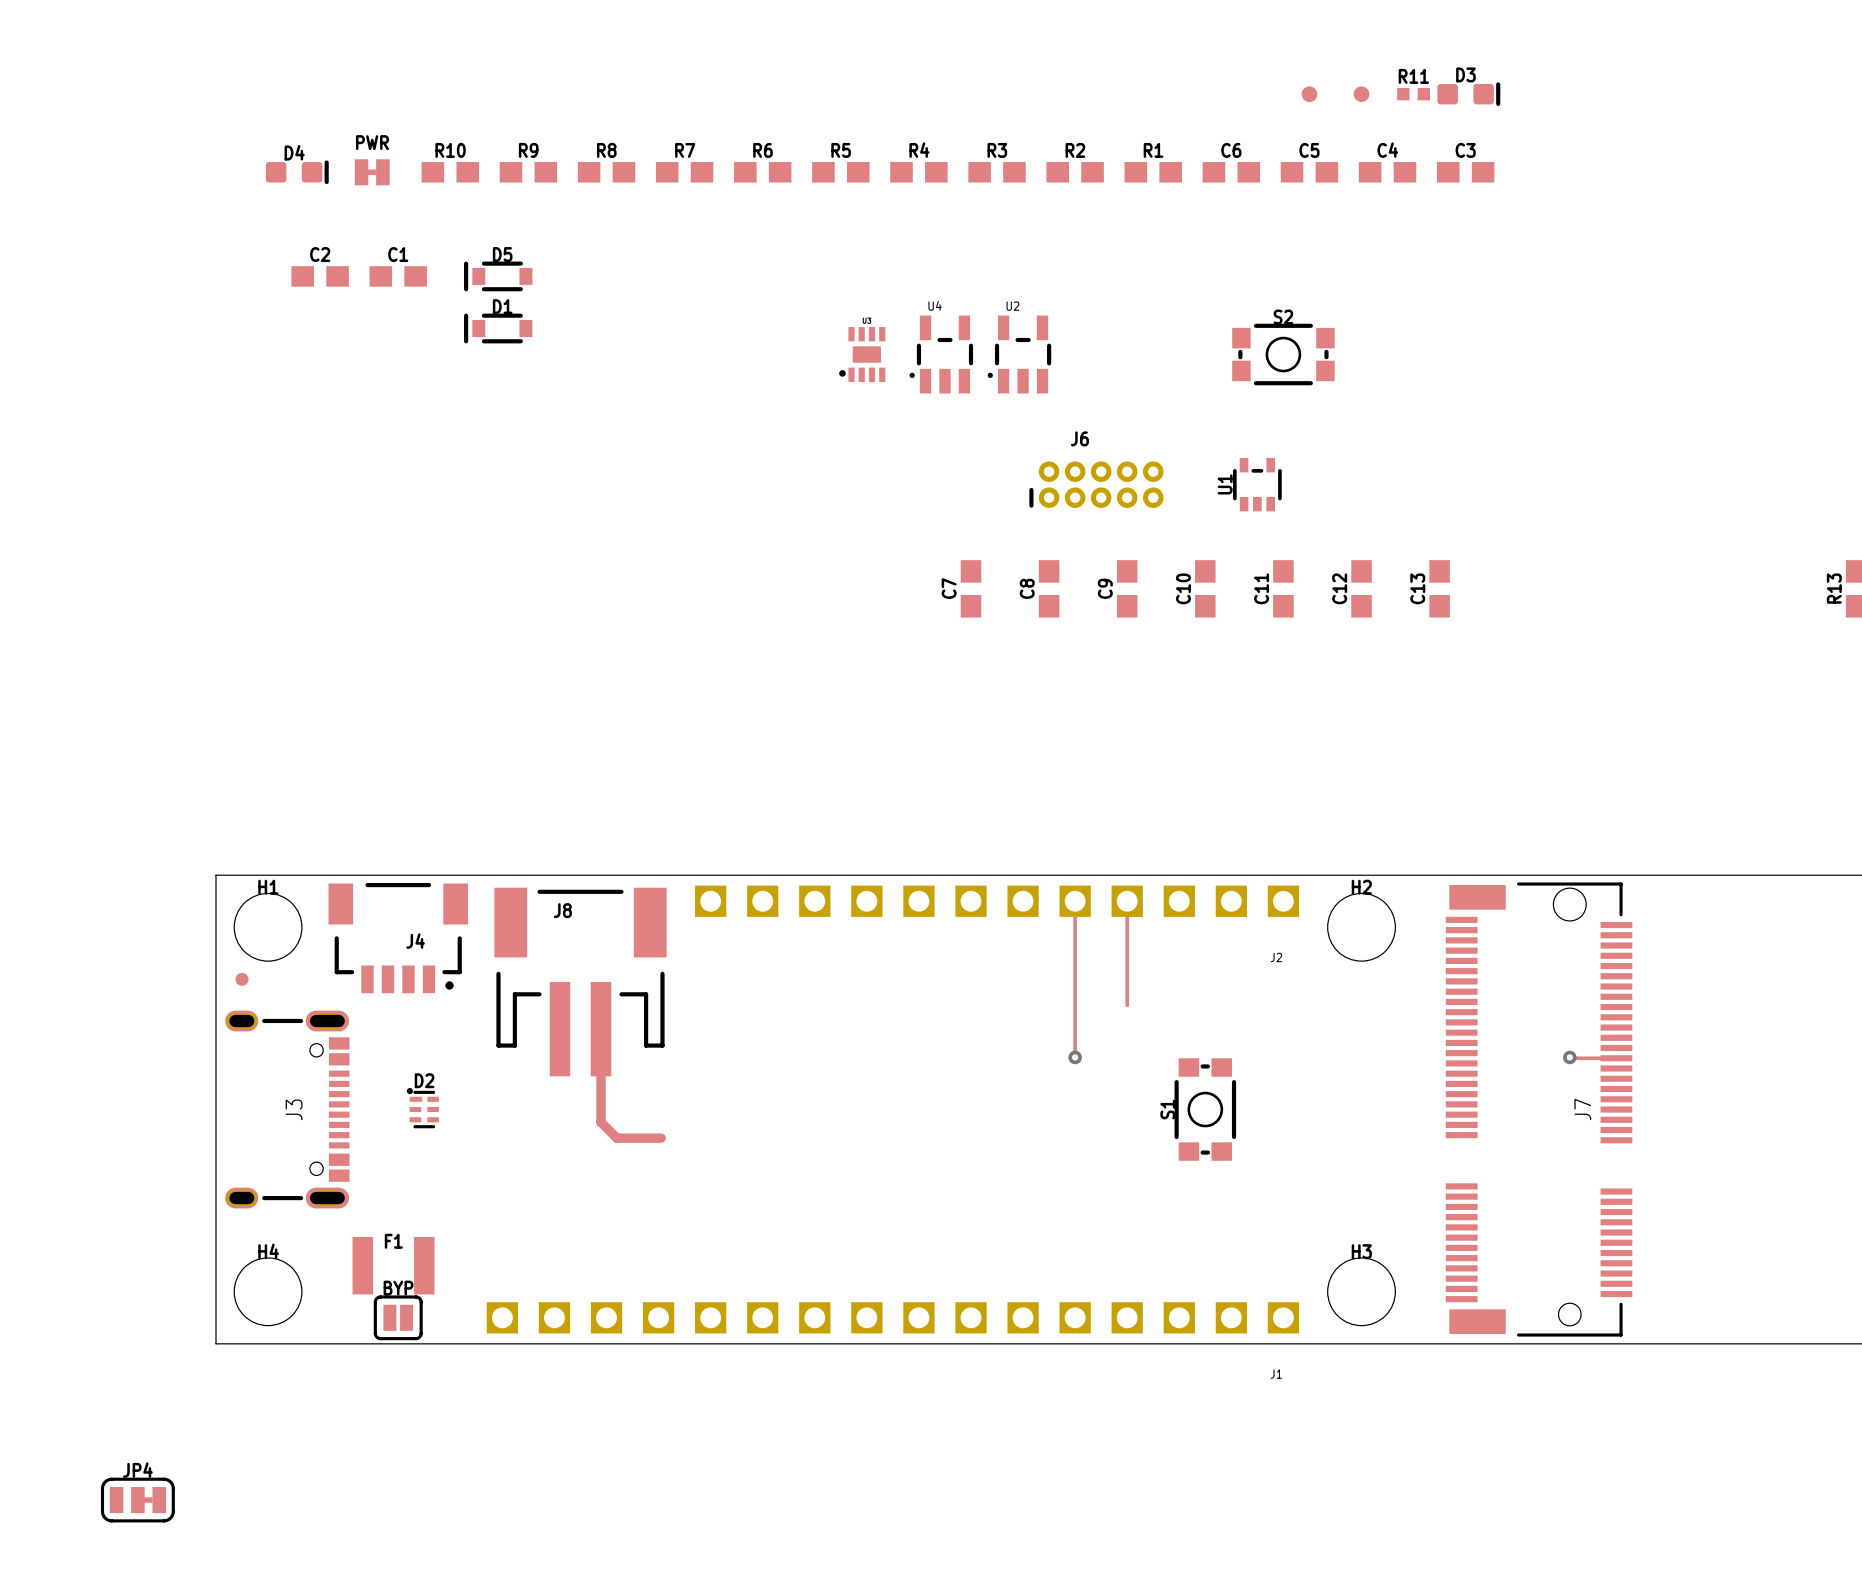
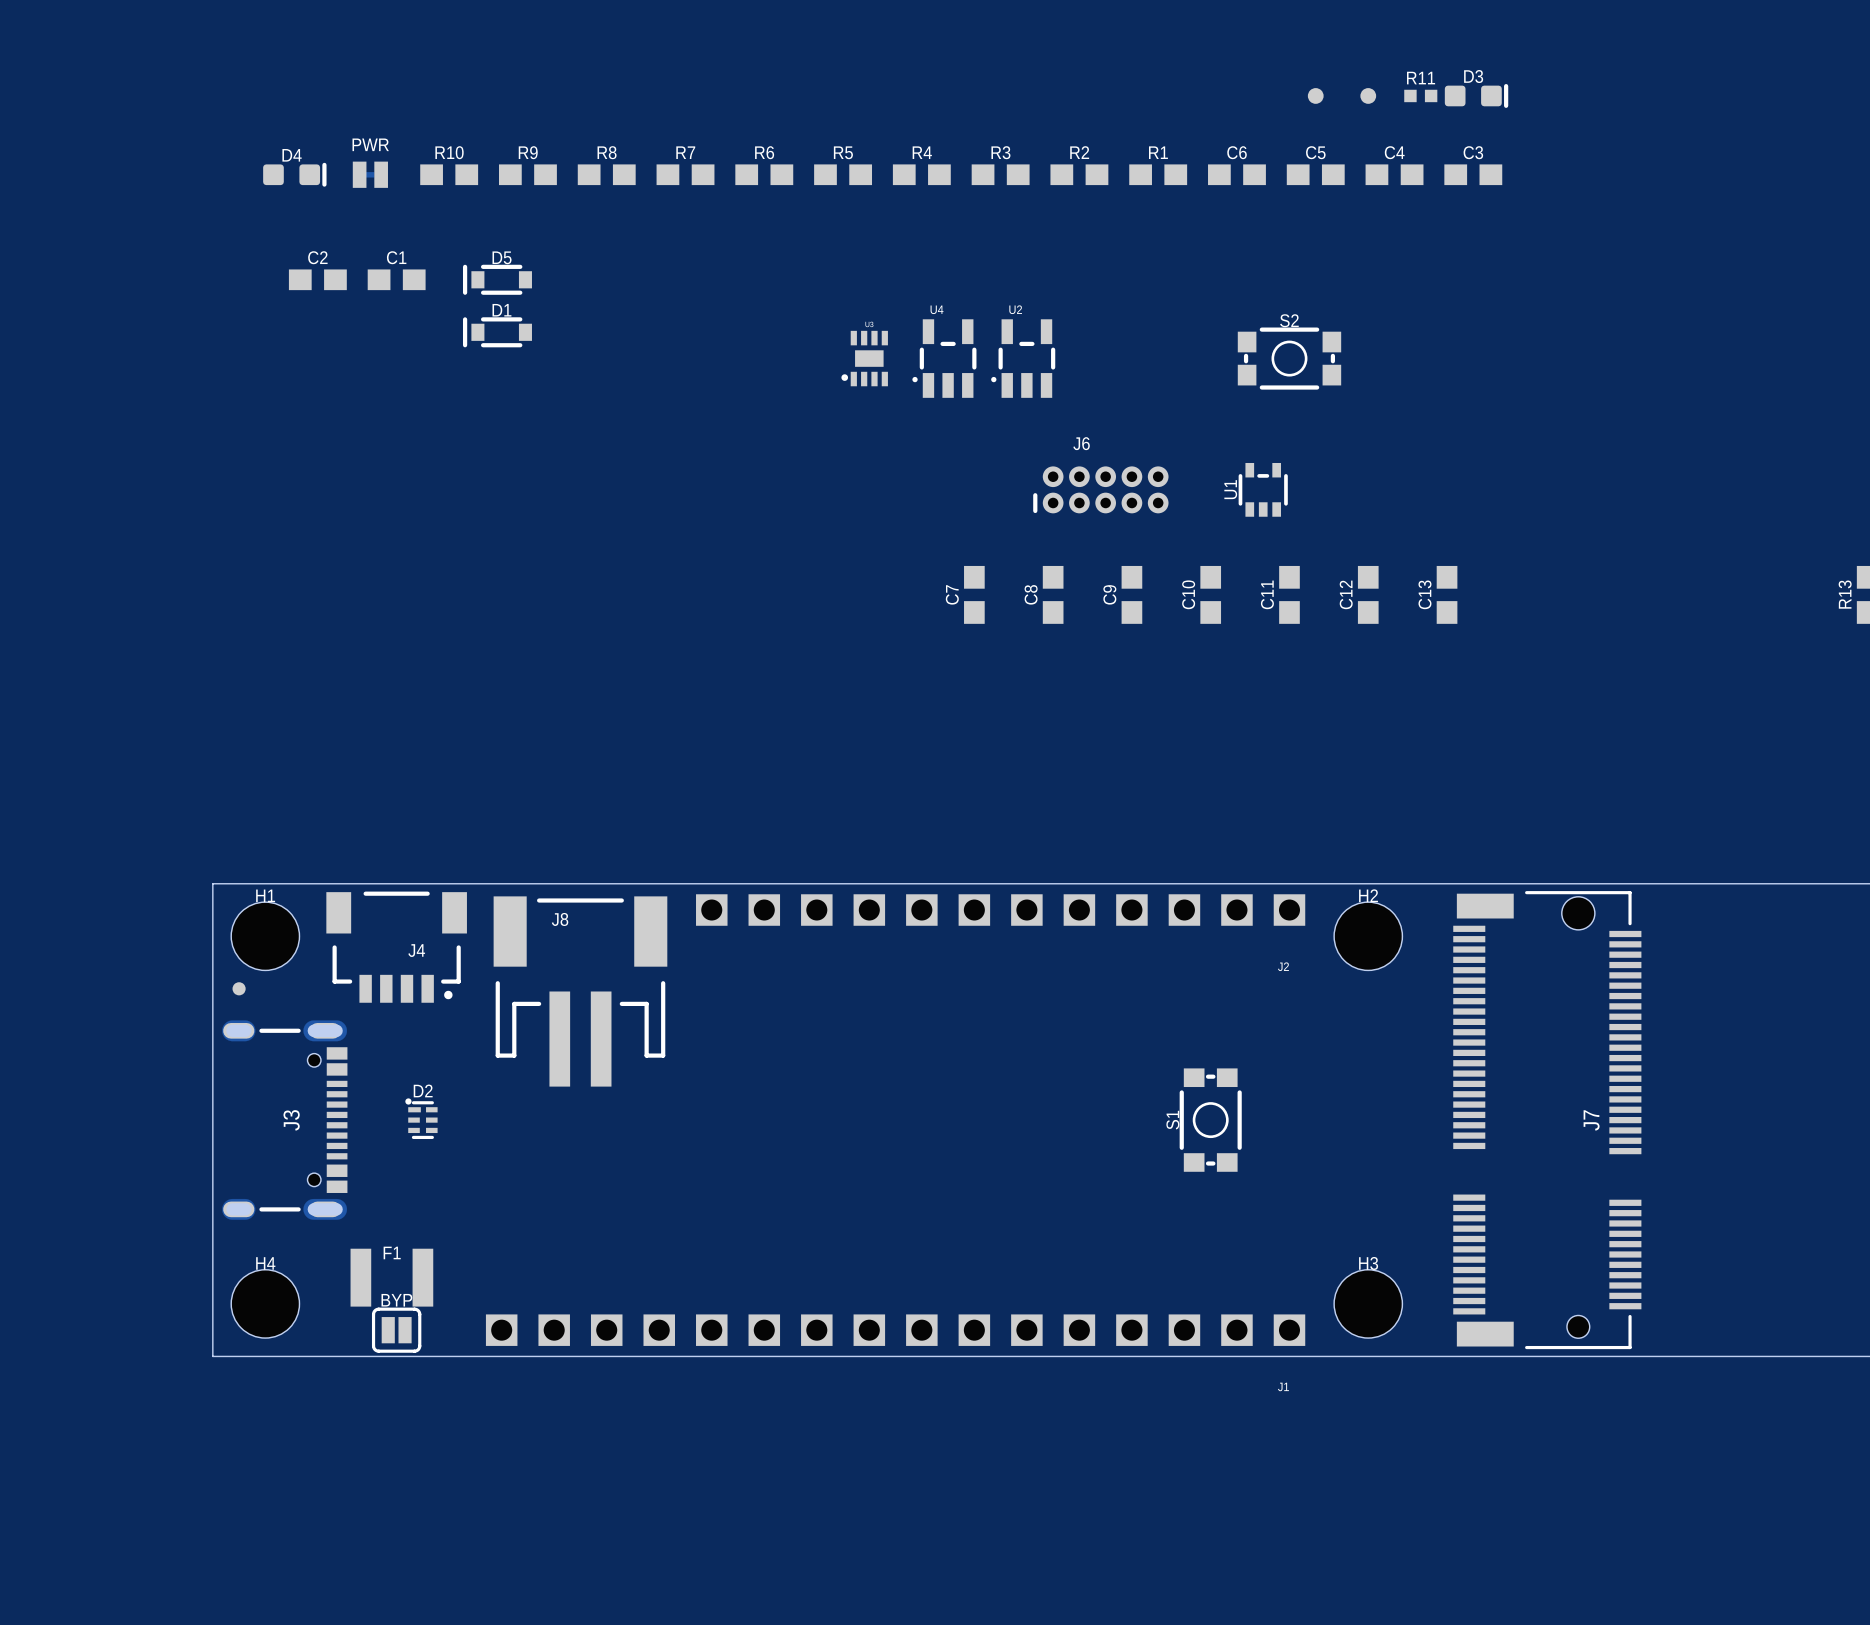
track: (1075, 901) (1075, 1057) -> none
track: (1127, 901) (1127, 1005) -> none
track: (600, 1029) (600, 1122) (616, 1138) (661, 1138) -> none
via: (1075, 1057) -> none
track: (1569, 1057) (1616, 1058) -> none
via: (1569, 1057) -> none
JP4: (137, 1500) -> none

